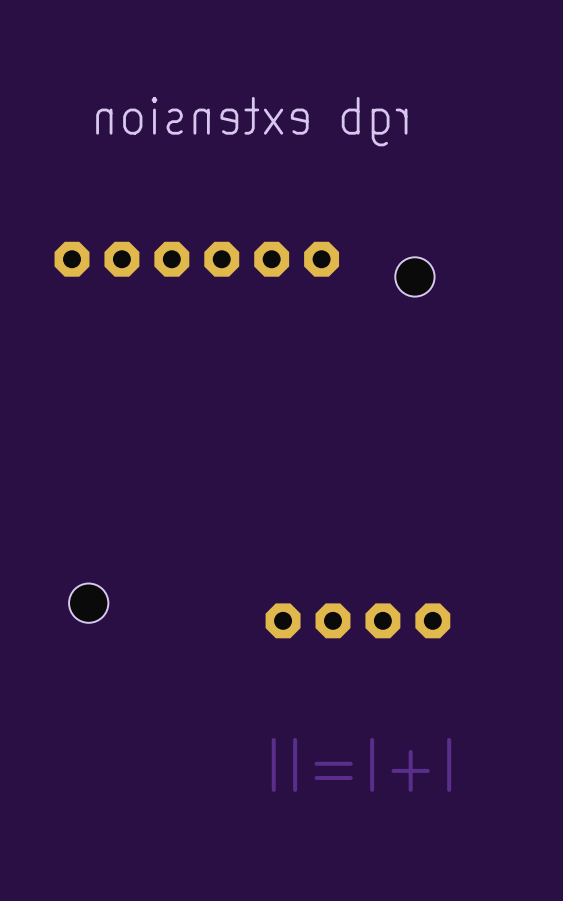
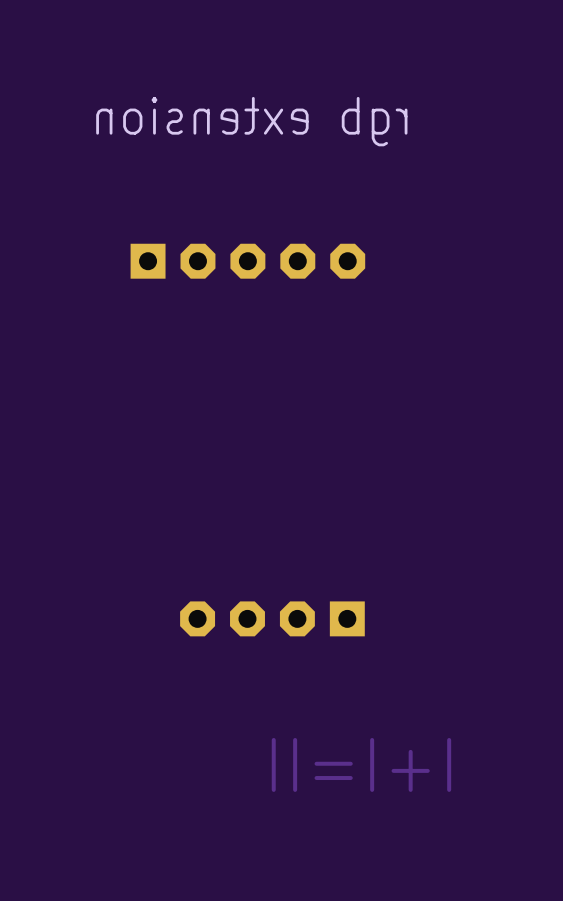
part: (196, 259) -> none
part: none -> (247, 261)
hole: (414, 276) -> none
hole: (88, 603) -> none
part: none -> (272, 618)
part: (357, 620) -> none

